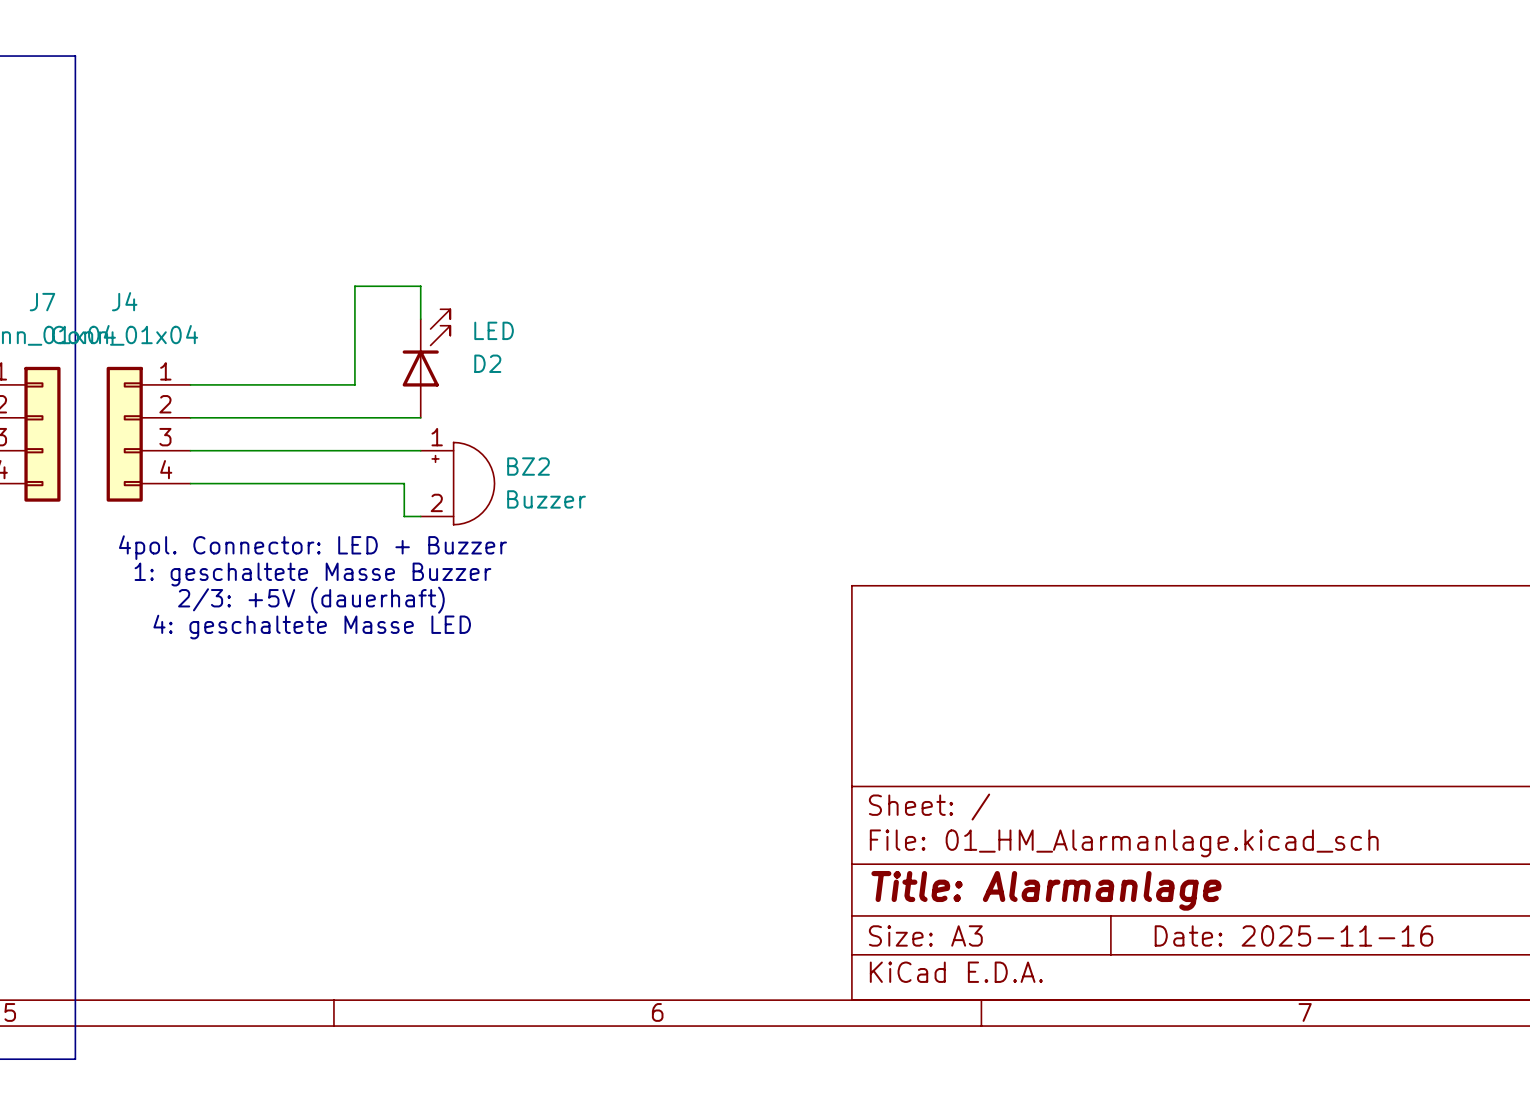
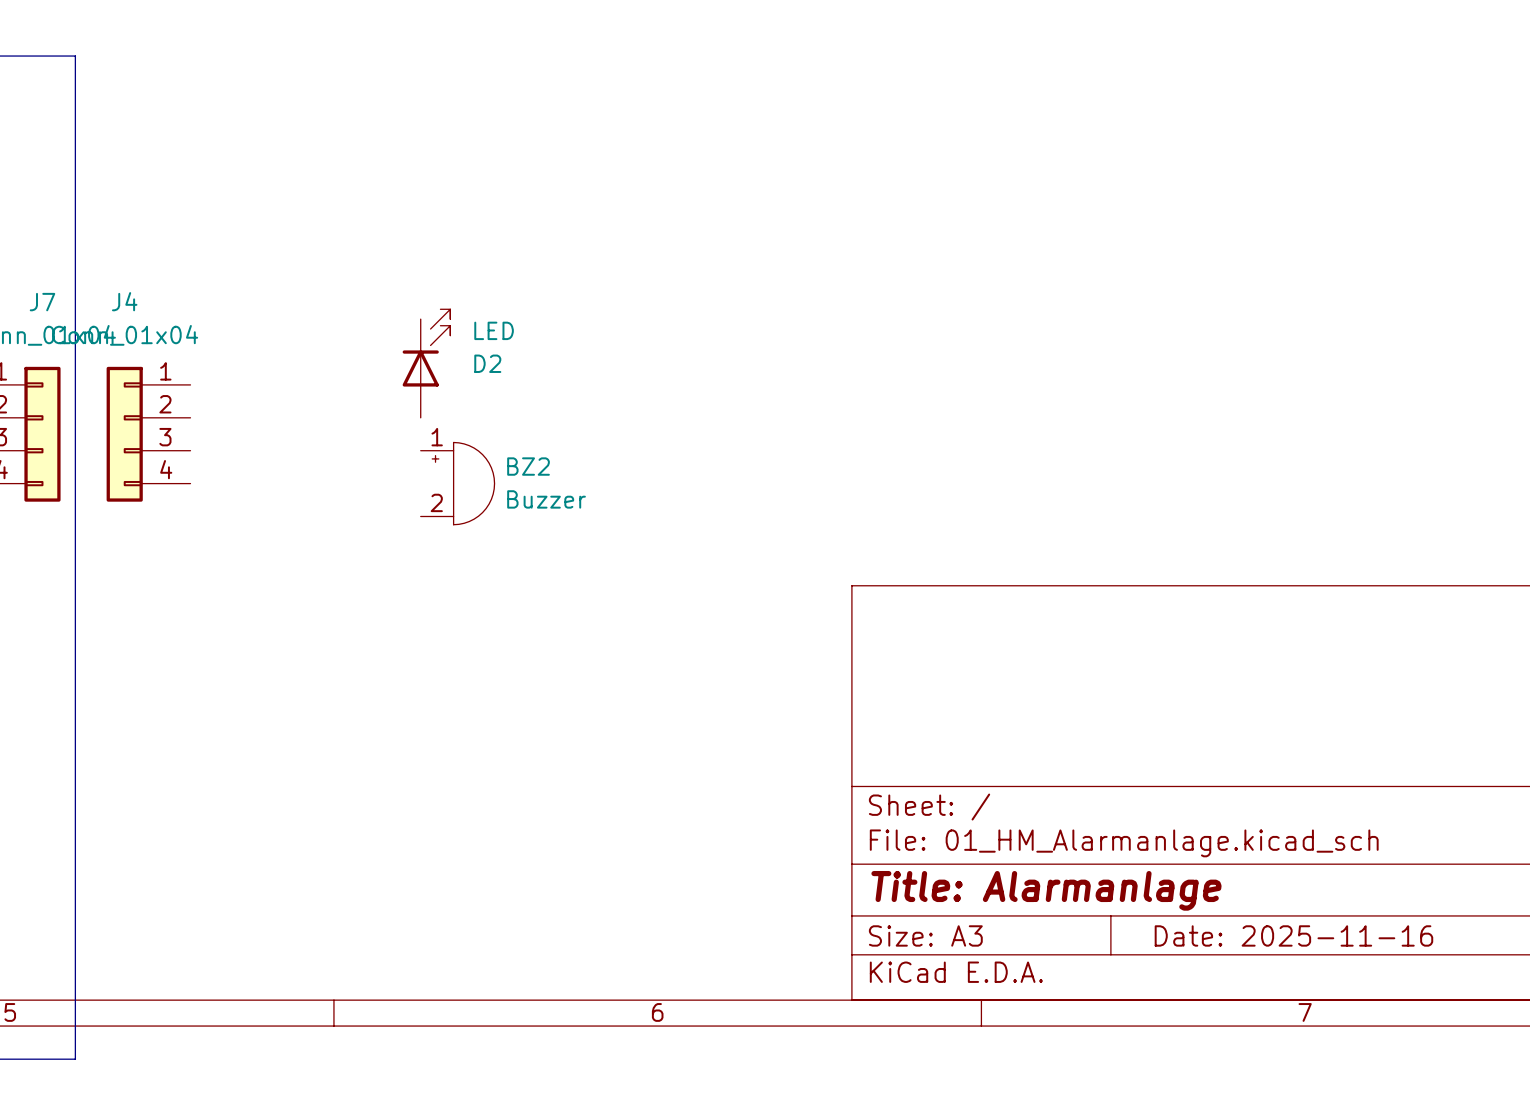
wire: (420, 319) (420, 286) (354, 286) (354, 384) (190, 384) -> none
wire: (190, 417) (420, 417) -> none
wire: (190, 450) (420, 450) -> none
wire: (190, 483) (404, 483) (404, 516) (420, 516) -> none
text: 4pol. Connector: LED + Buzzer (312, 547) -> none
text: 1: geschaltete Masse Buzzer (312, 574) -> none
text: 2/3: +5V (dauerhaft) (311, 600) -> none
text: 4: geschaltete Masse LED (312, 627) -> none

